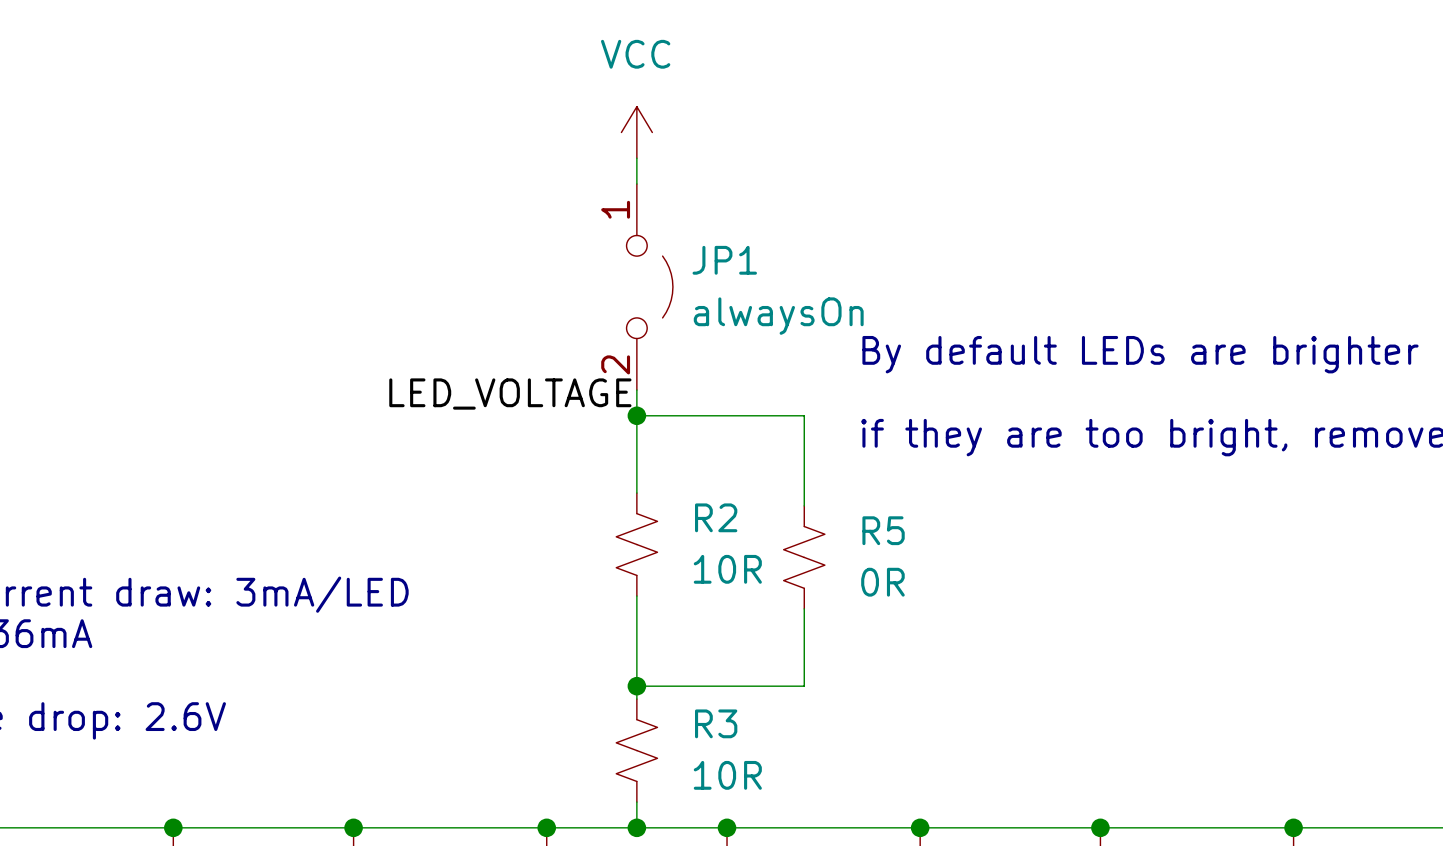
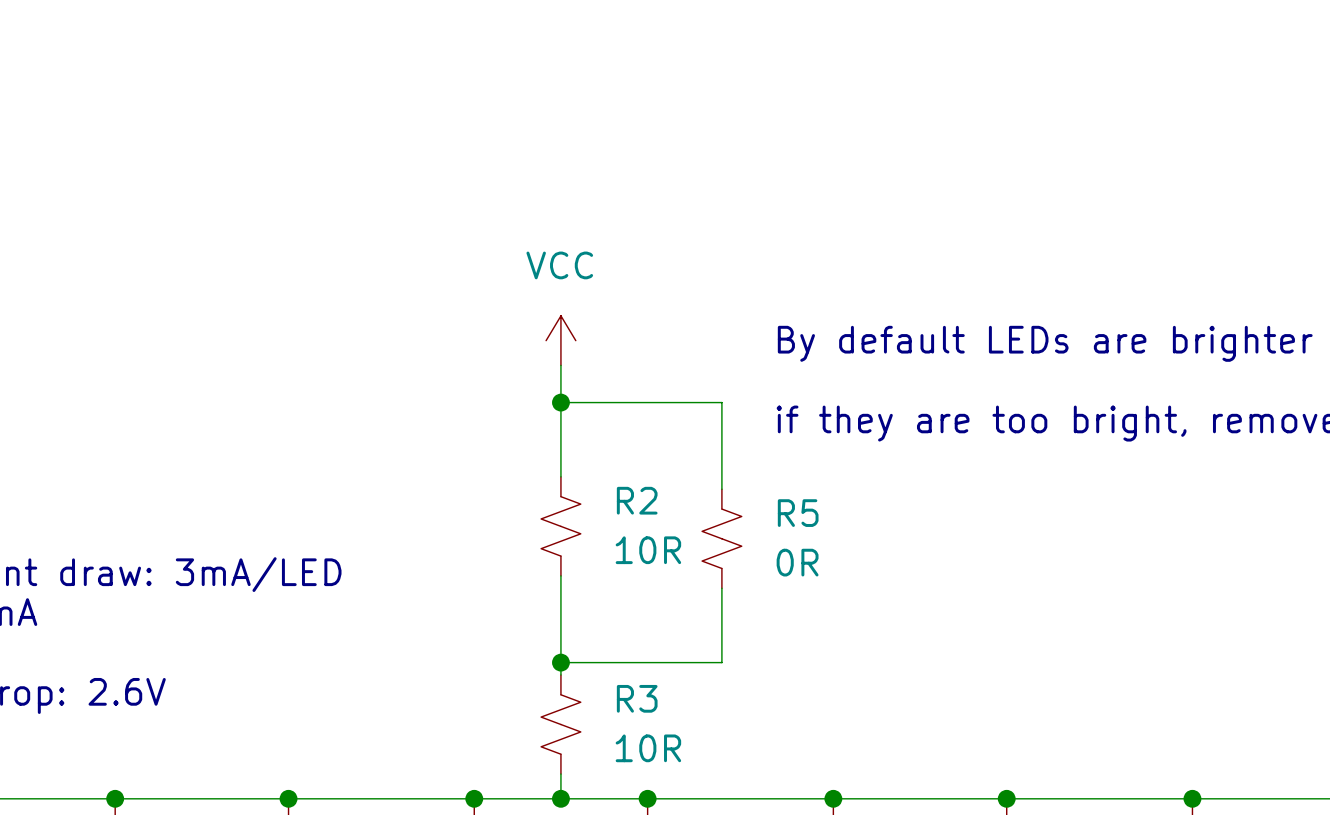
power symbol position: VCC (636, 132) -> VCC (560, 340)
wire: (636, 158) (636, 184) -> none
JP1: alwaysOn (649, 287) -> none
label: LED_VOLTAGE (510, 394) -> none

